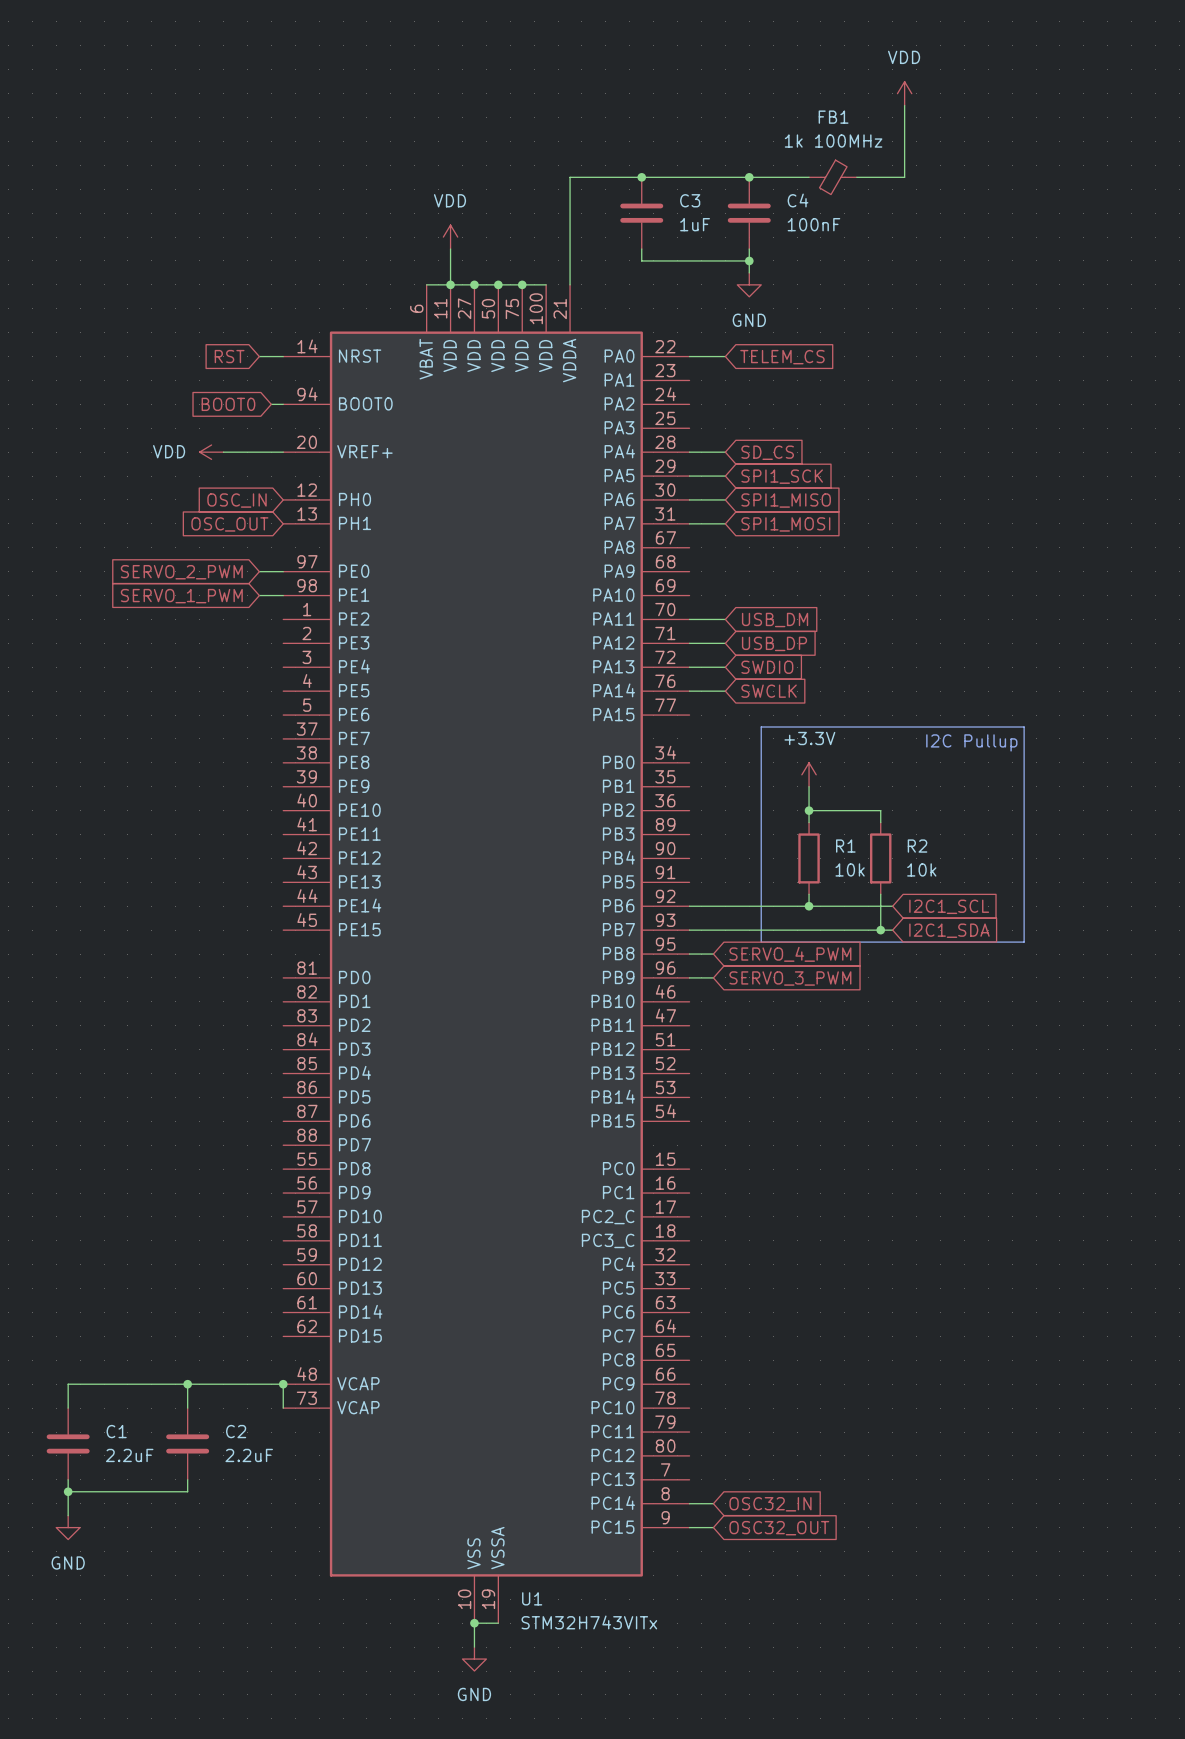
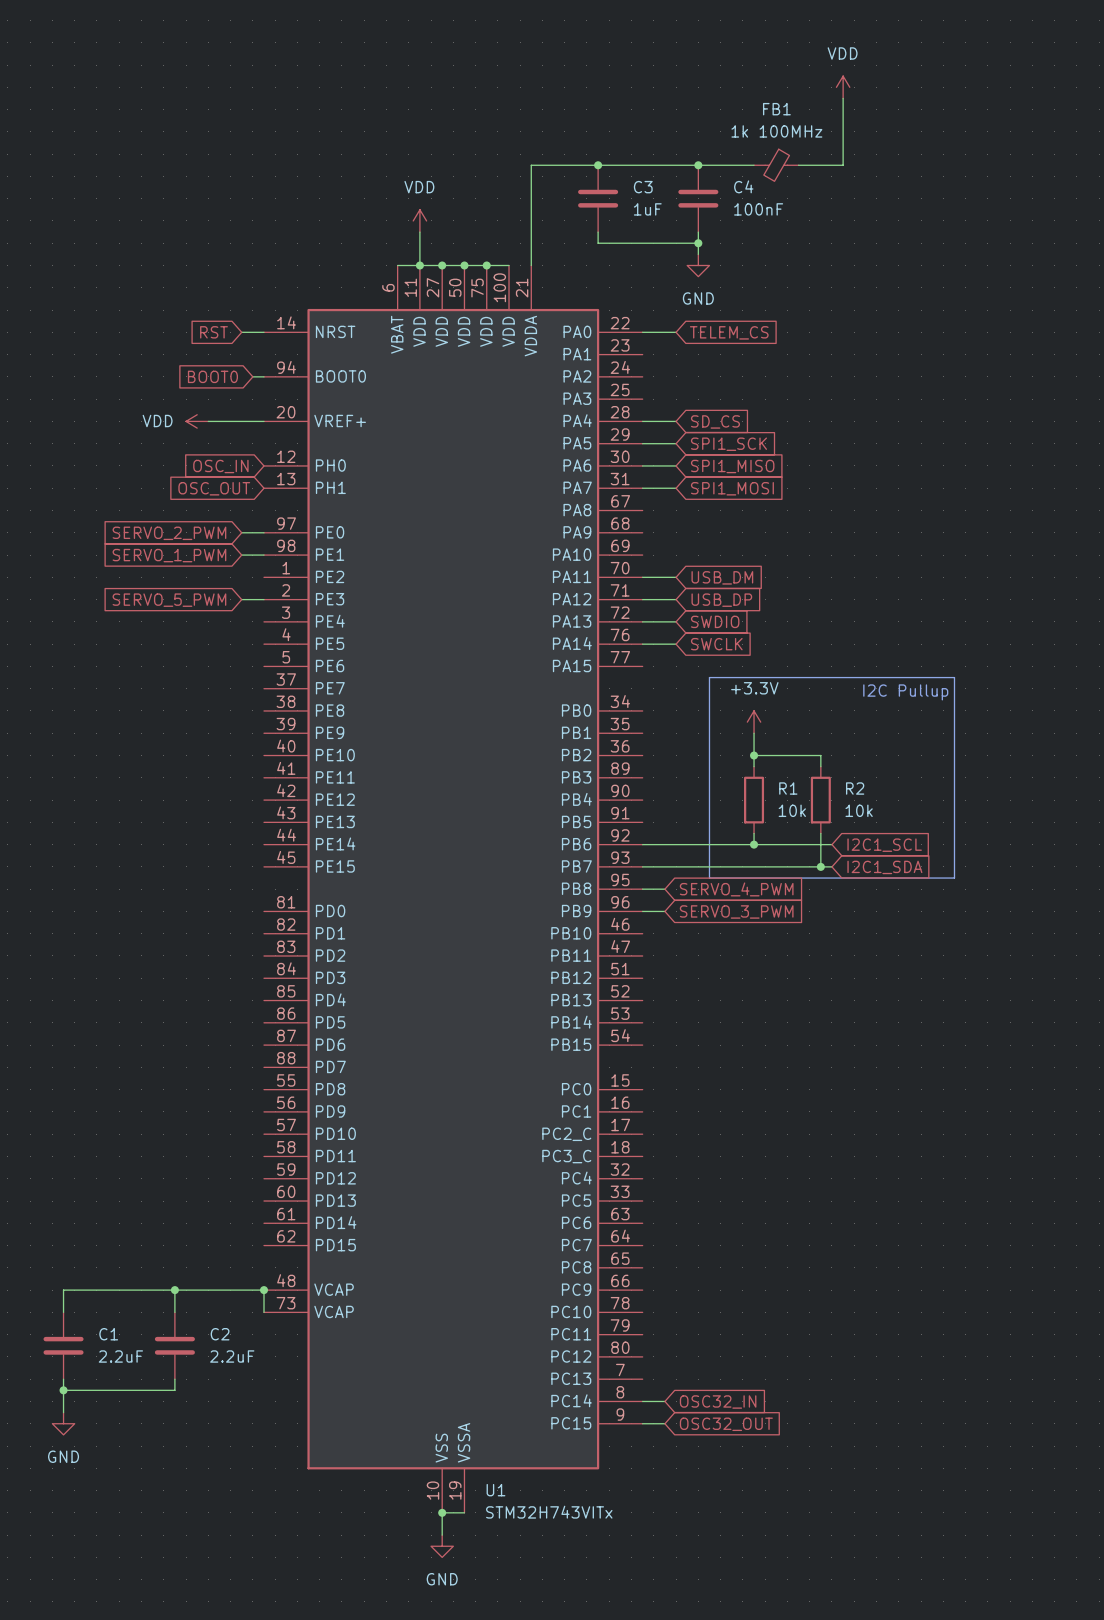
global label: none -> SERVO_5_PWM (169, 600)
wire: none -> (241, 599) (264, 599)

